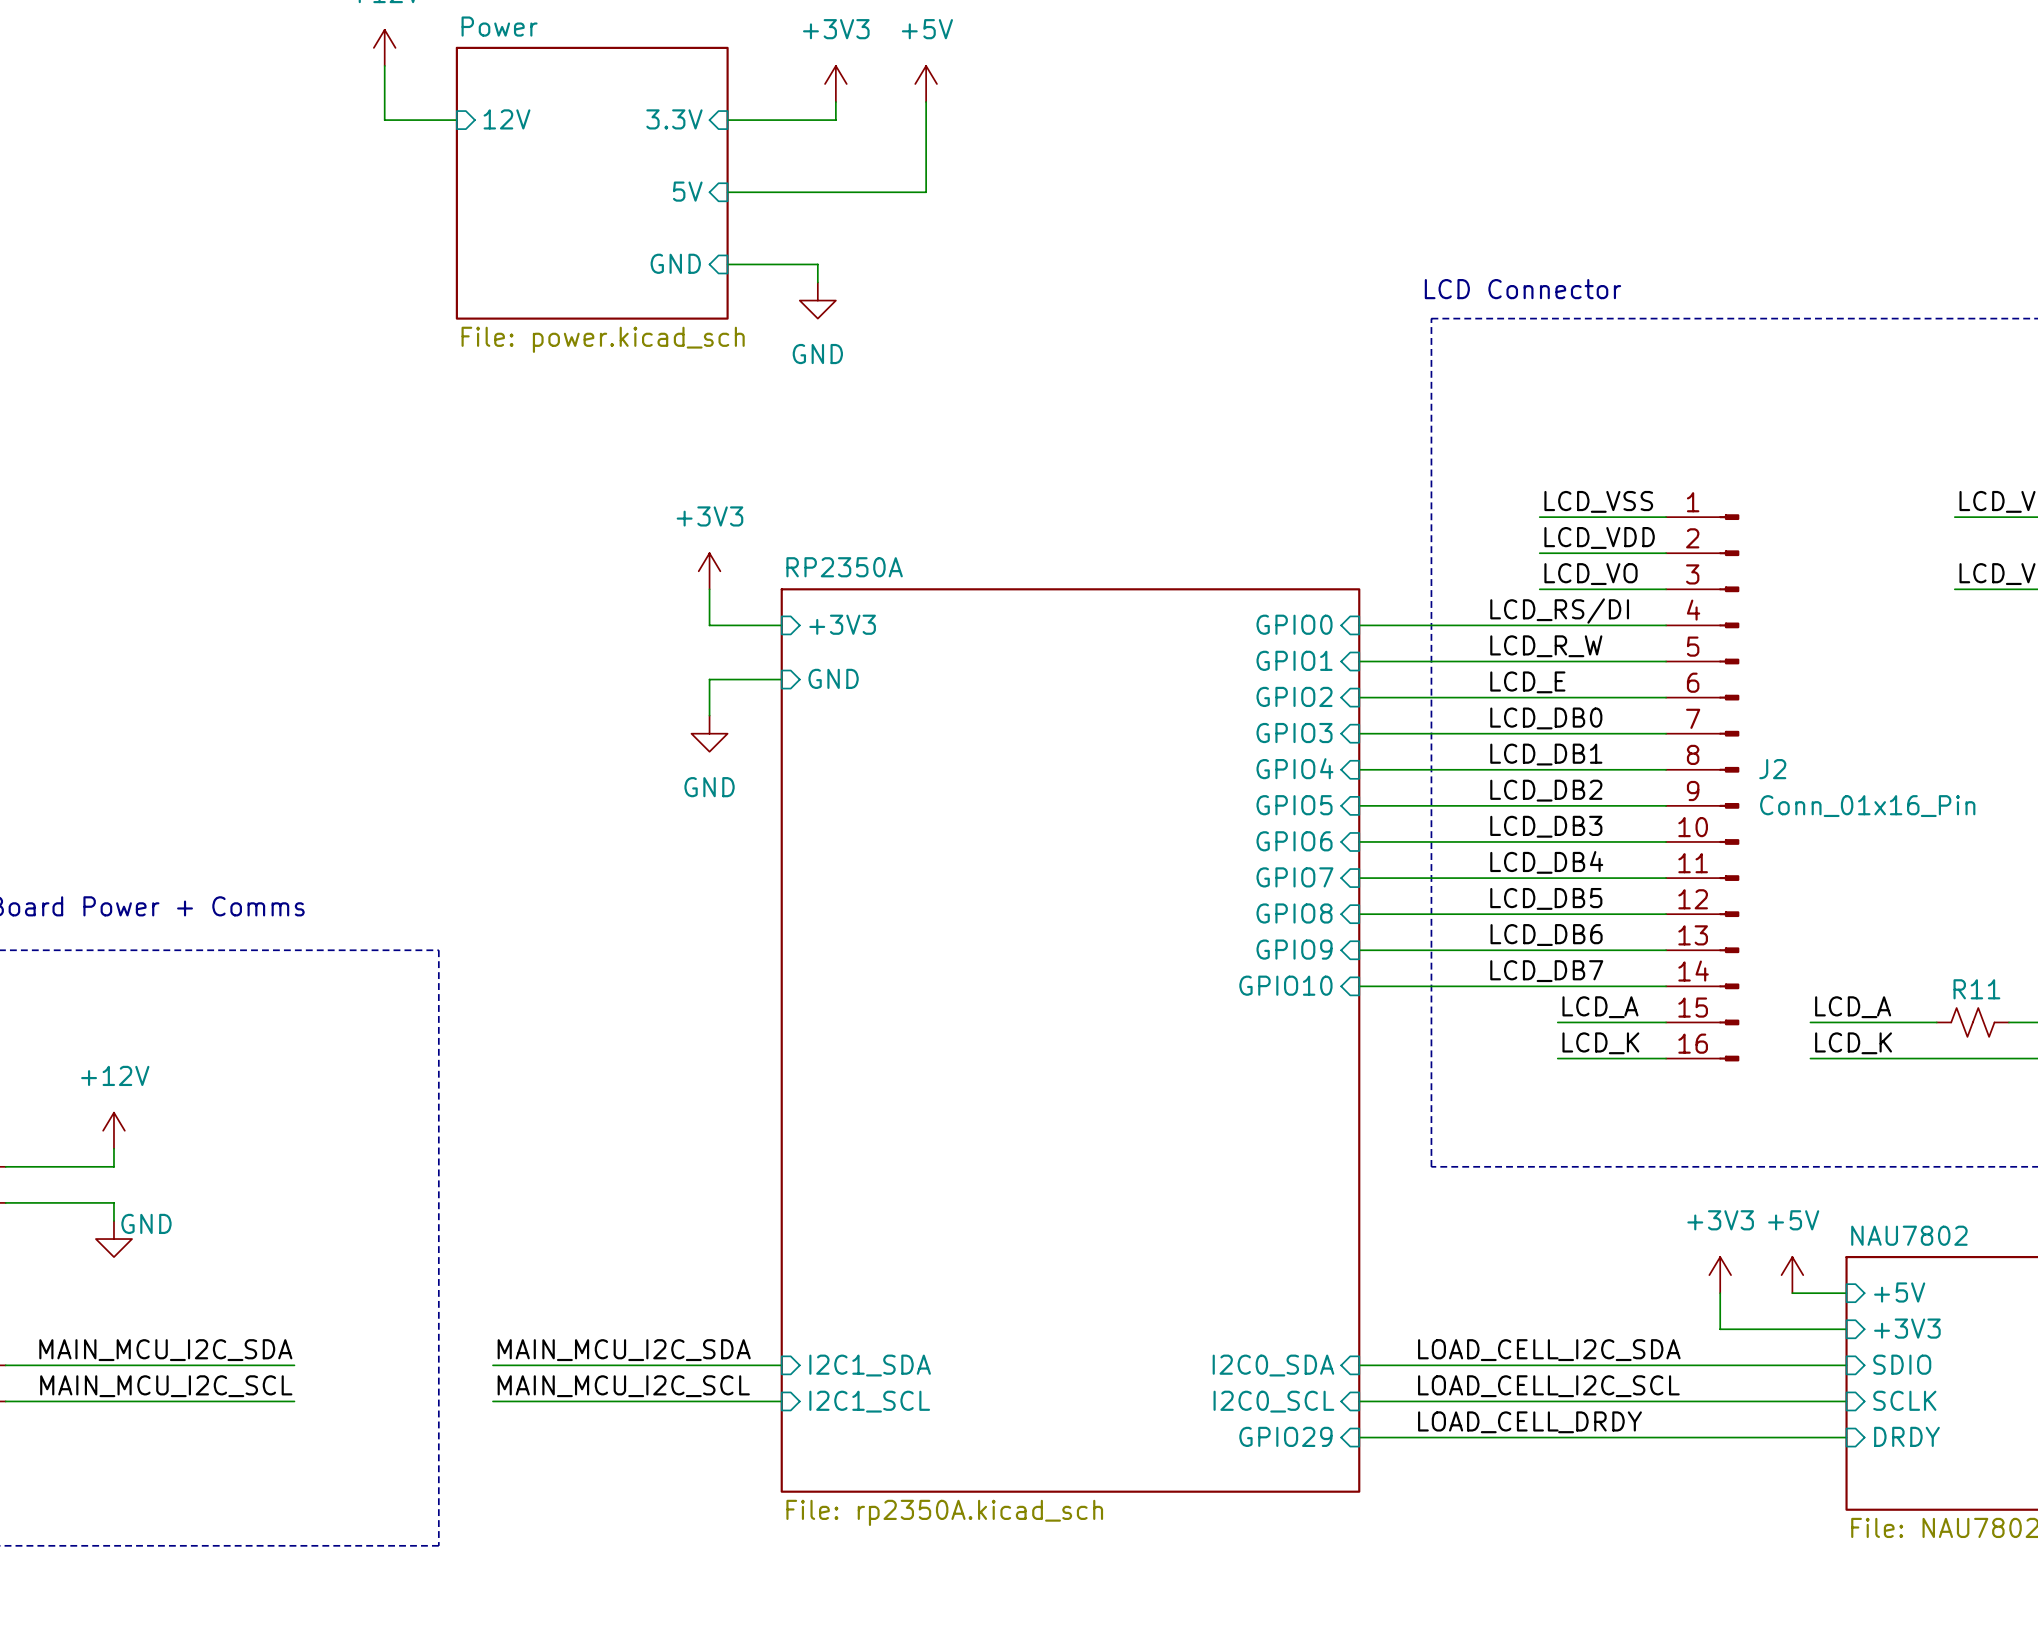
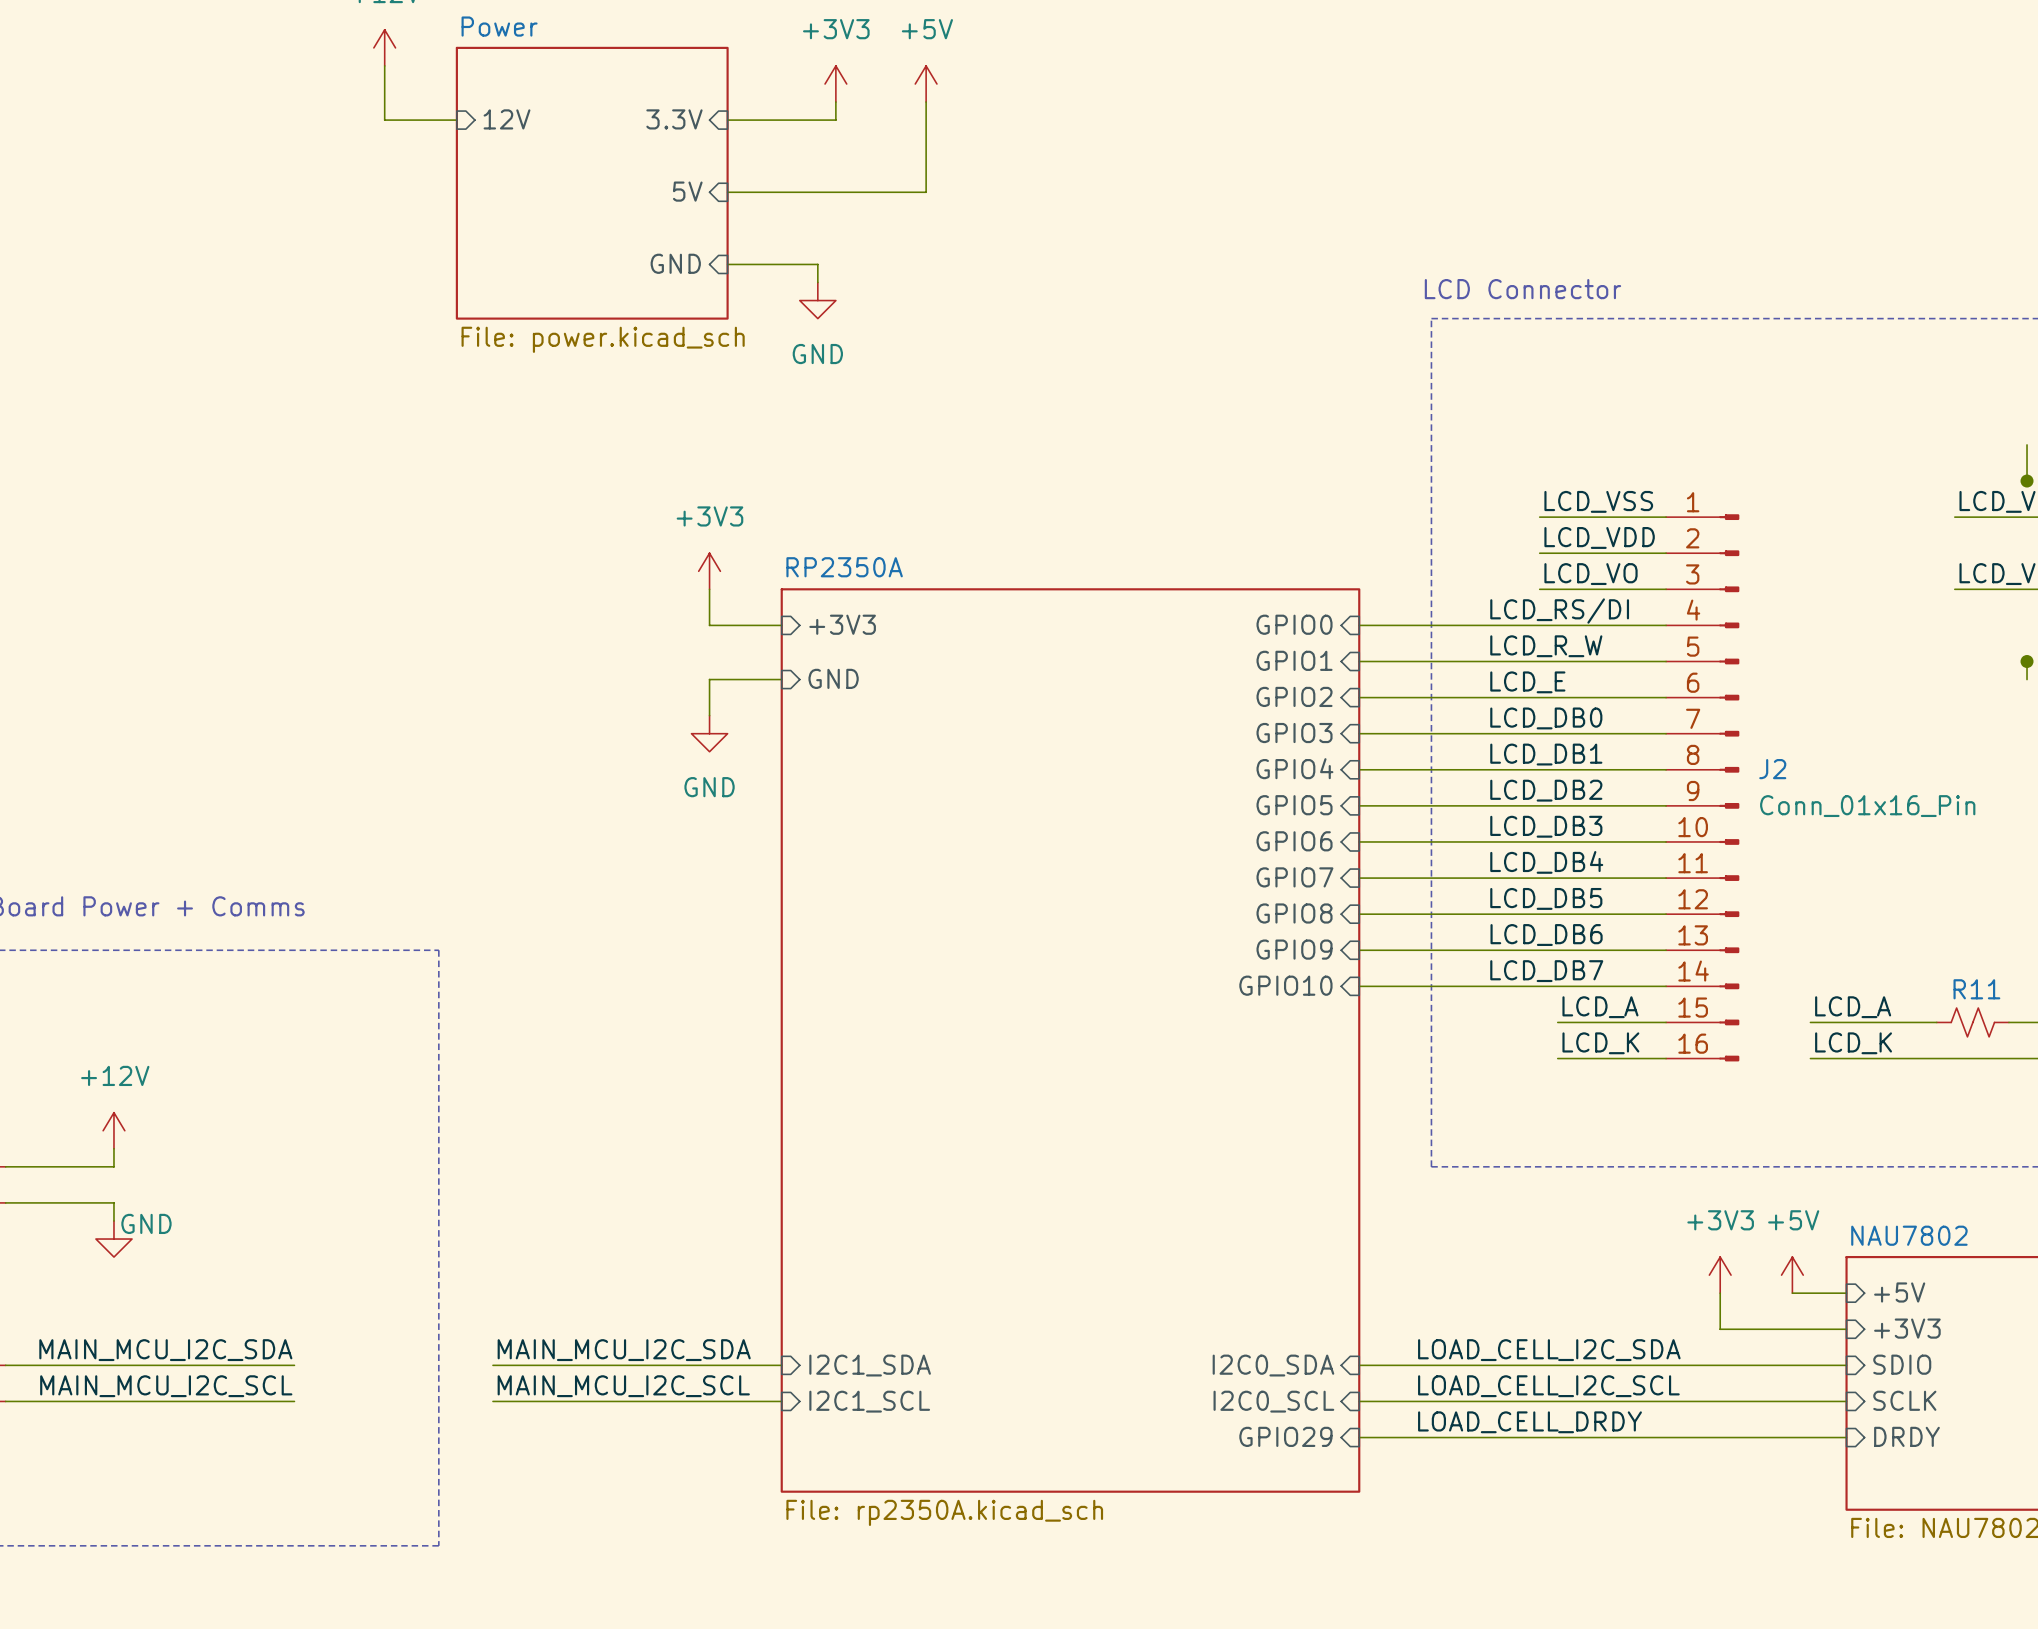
wire: none -> (2027, 444) (2027, 481)
junction: none -> (2027, 481)
wire: none -> (2027, 661) (2027, 679)
junction: none -> (2027, 661)

